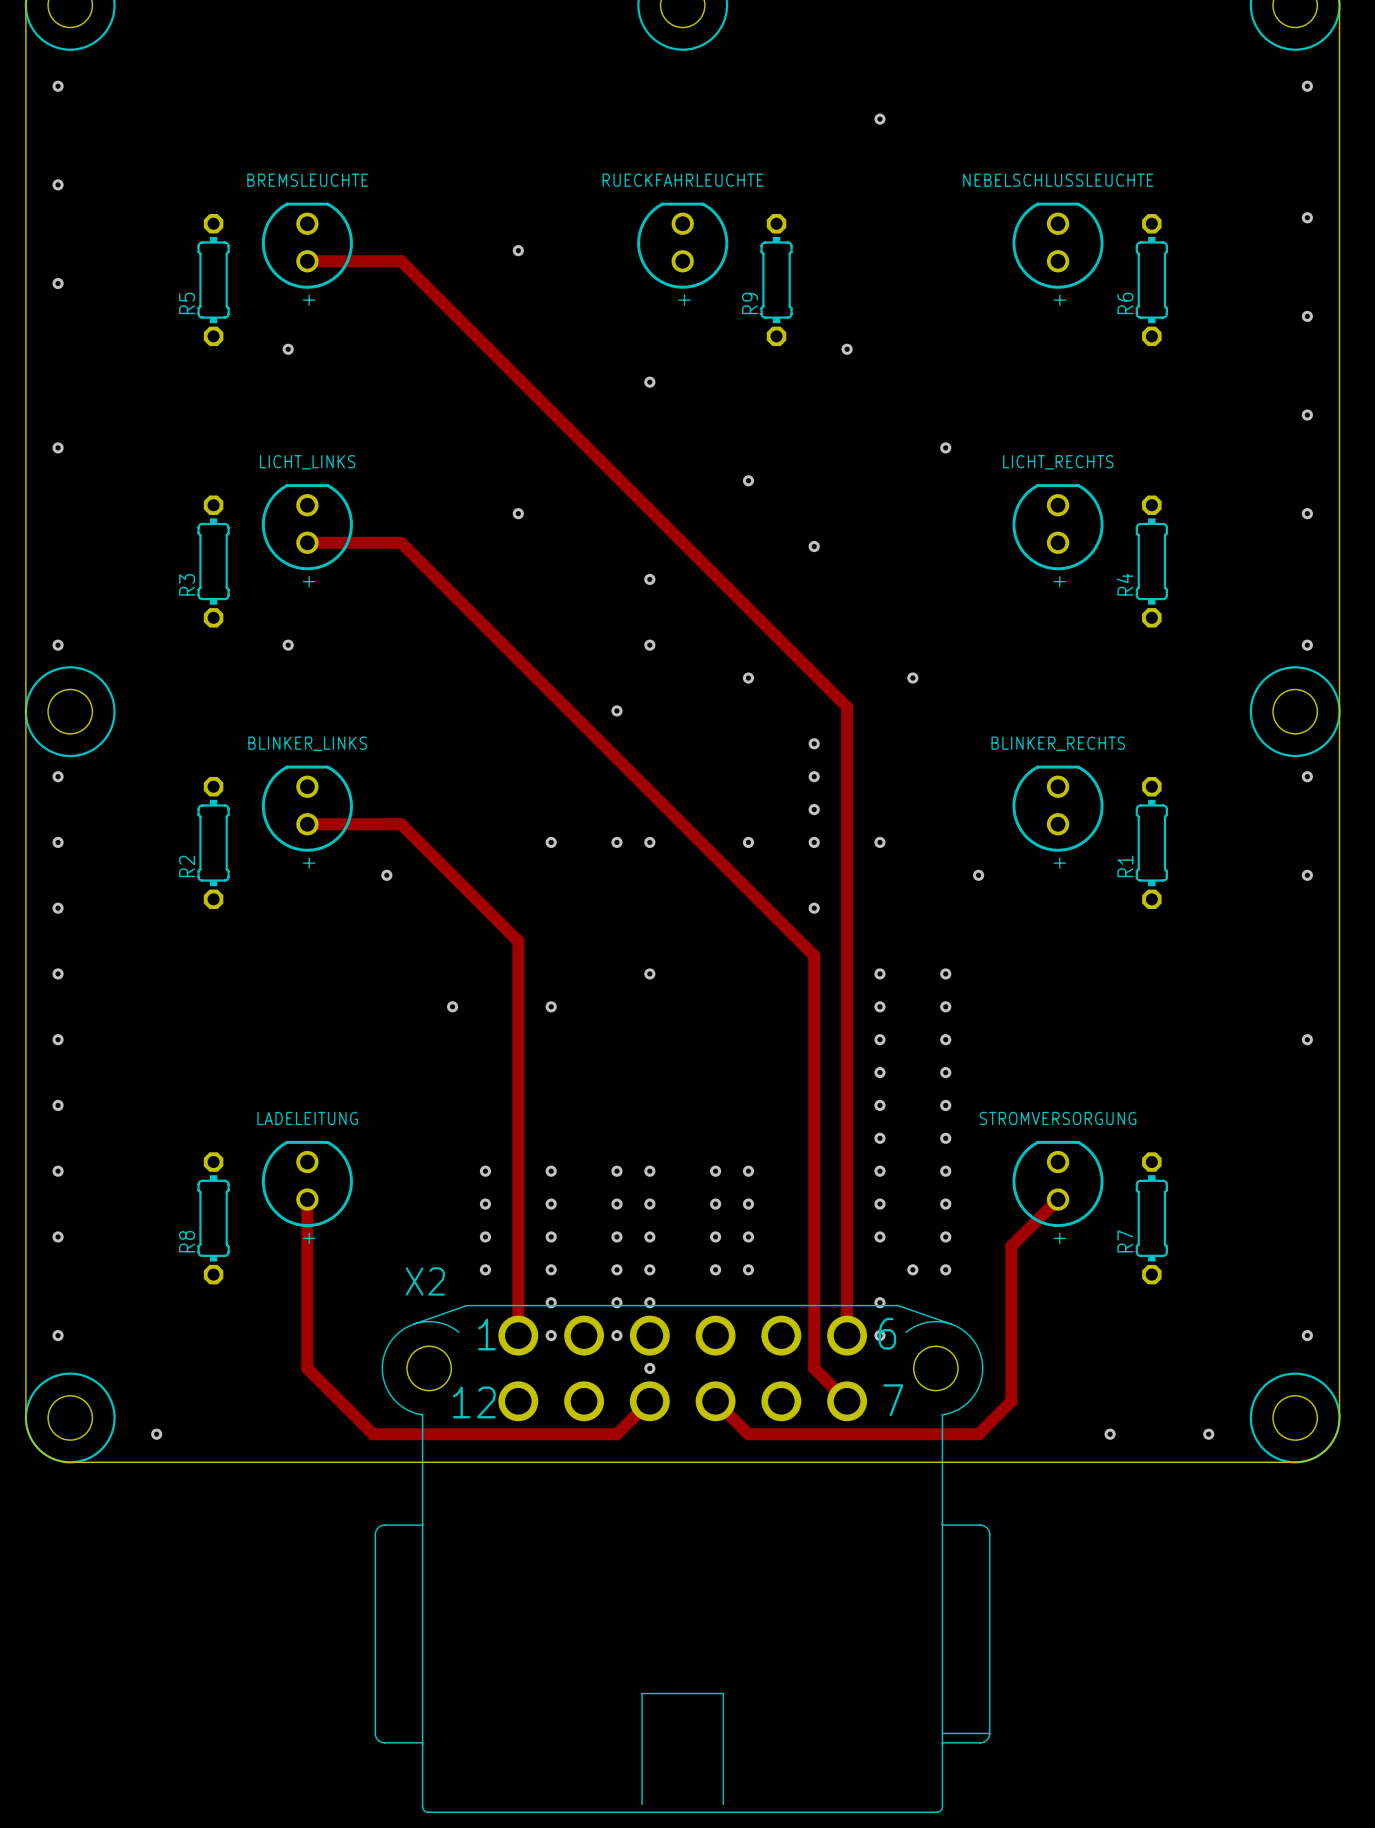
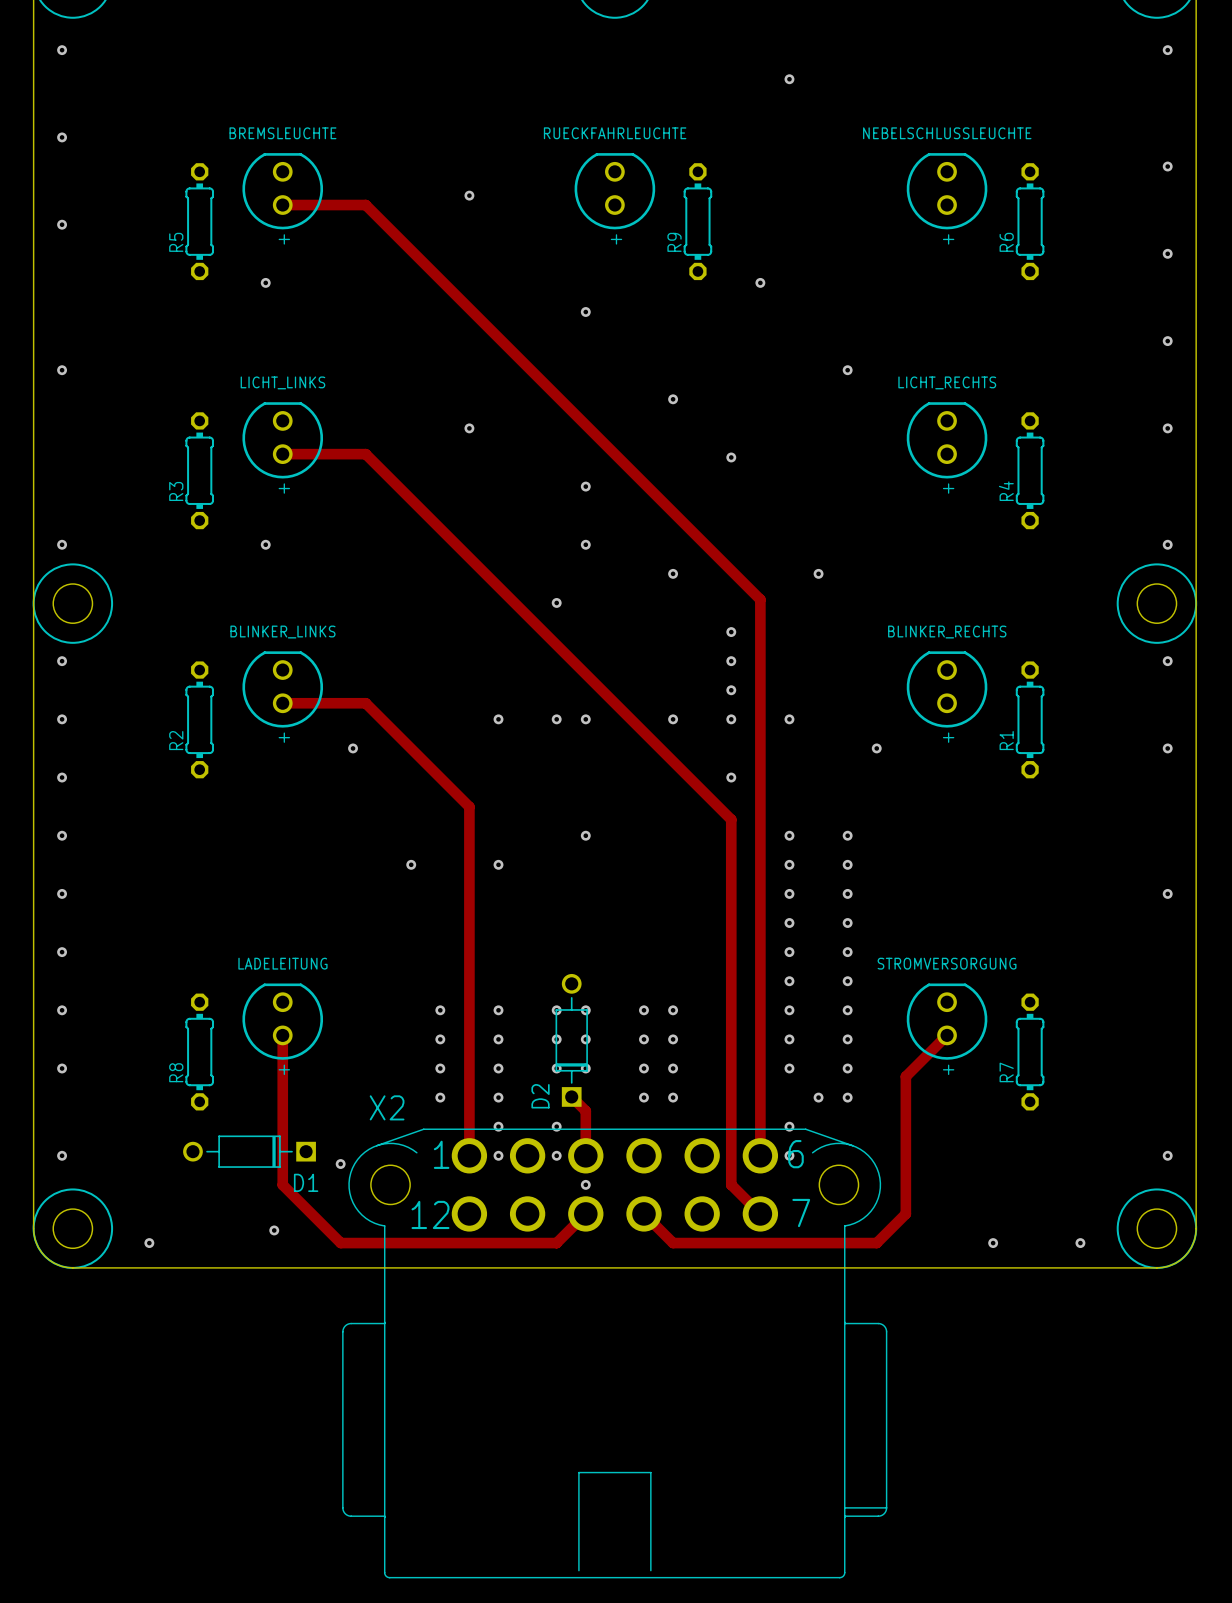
D2: none -> (571, 1040)
via: (616, 1269) -> none
track: none -> (571, 1096) (585, 1111) (585, 1155)
via: (649, 1269) -> none
via: (649, 1302) -> none
D1: none -> (249, 1151)
via: none -> (340, 1164)
via: none -> (274, 1230)

